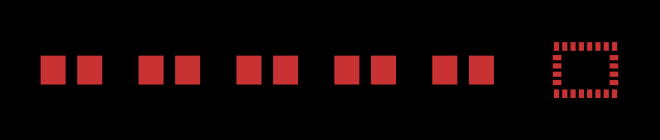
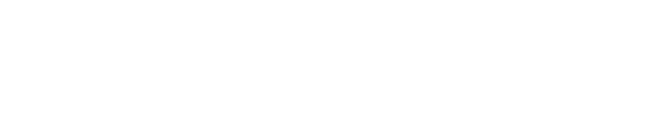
part: (71, 70) -> none
part: (169, 70) -> none
part: (267, 70) -> none
part: (365, 70) -> none
part: (463, 70) -> none
part: (585, 70) -> none

